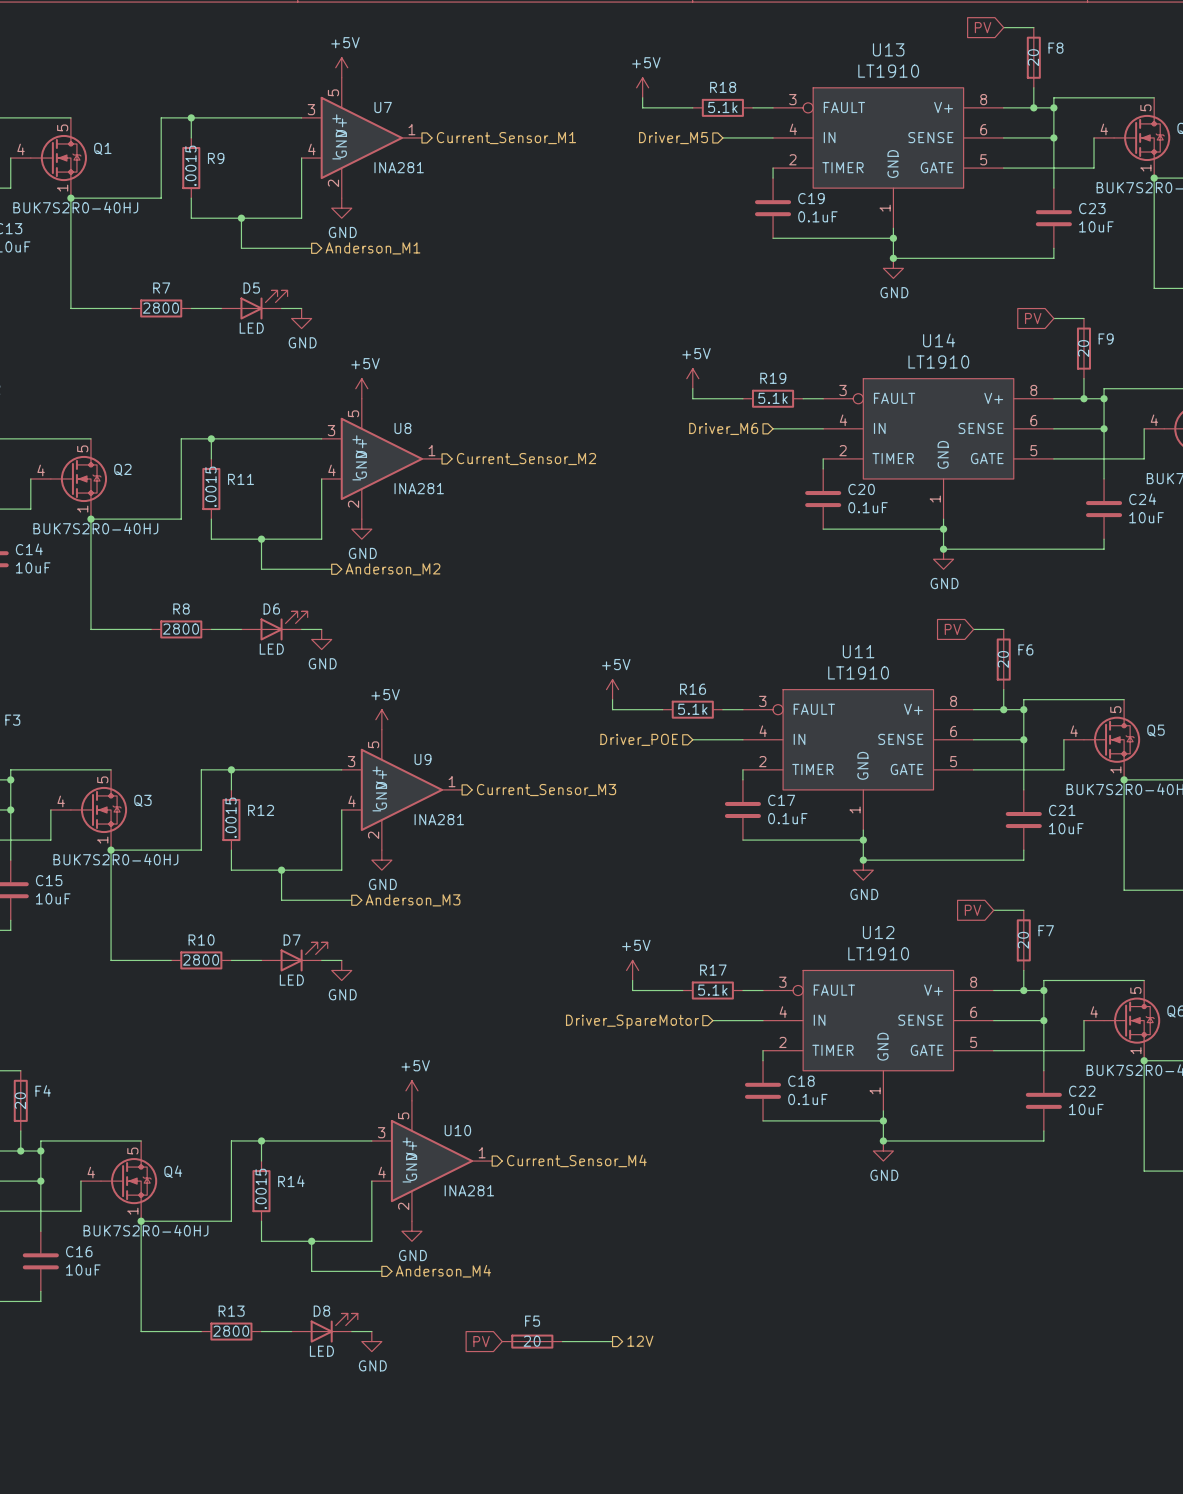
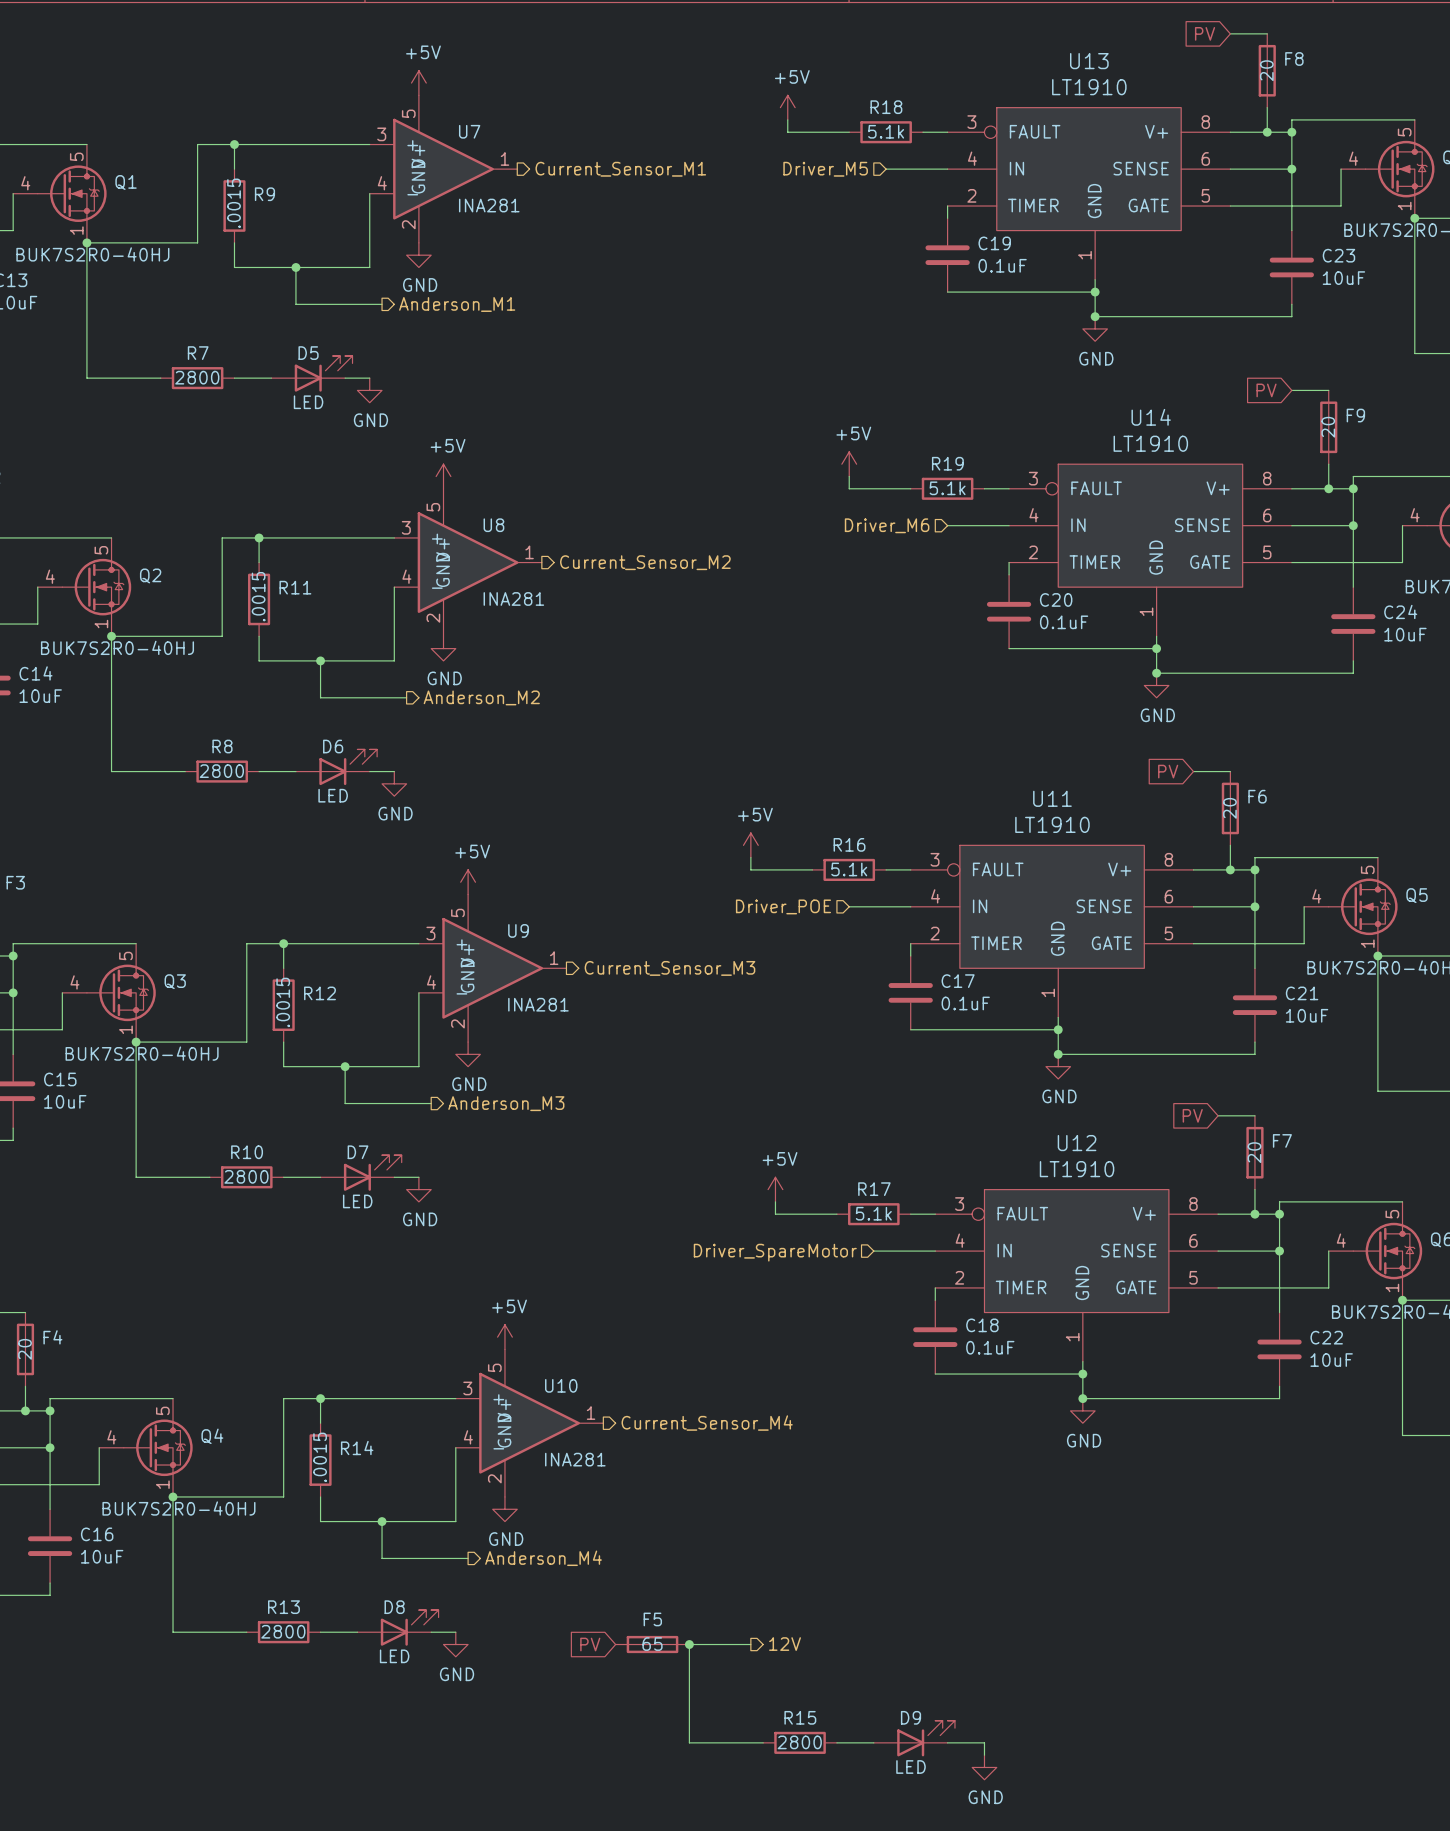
F5 value: 20 (532, 1341) -> 65 (652, 1644)
wire: none -> (689, 1644) (689, 1742) (763, 1742)
junction: none -> (689, 1644)
D9: none -> LED (914, 1738)
R15: none -> 2800 (800, 1742)
wire: none -> (836, 1742) (873, 1742)
wire: none -> (947, 1742) (984, 1742) (984, 1755)
power symbol: none -> GND (984, 1767)

